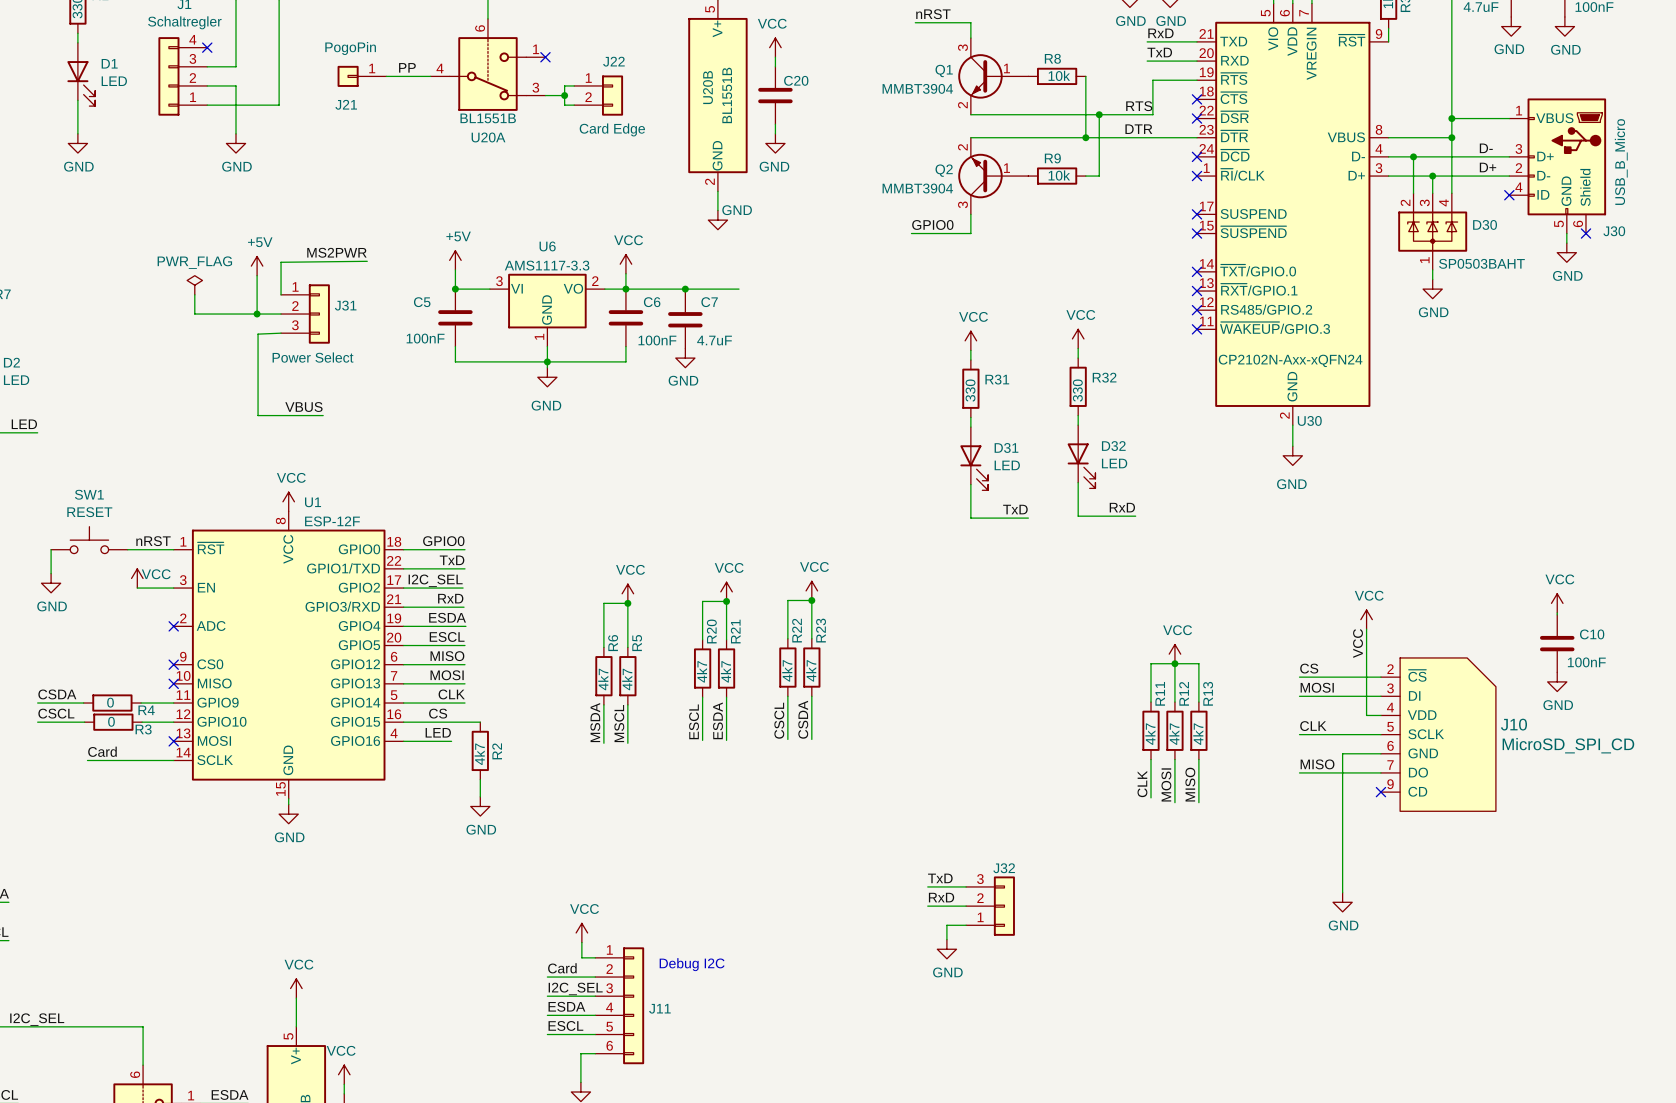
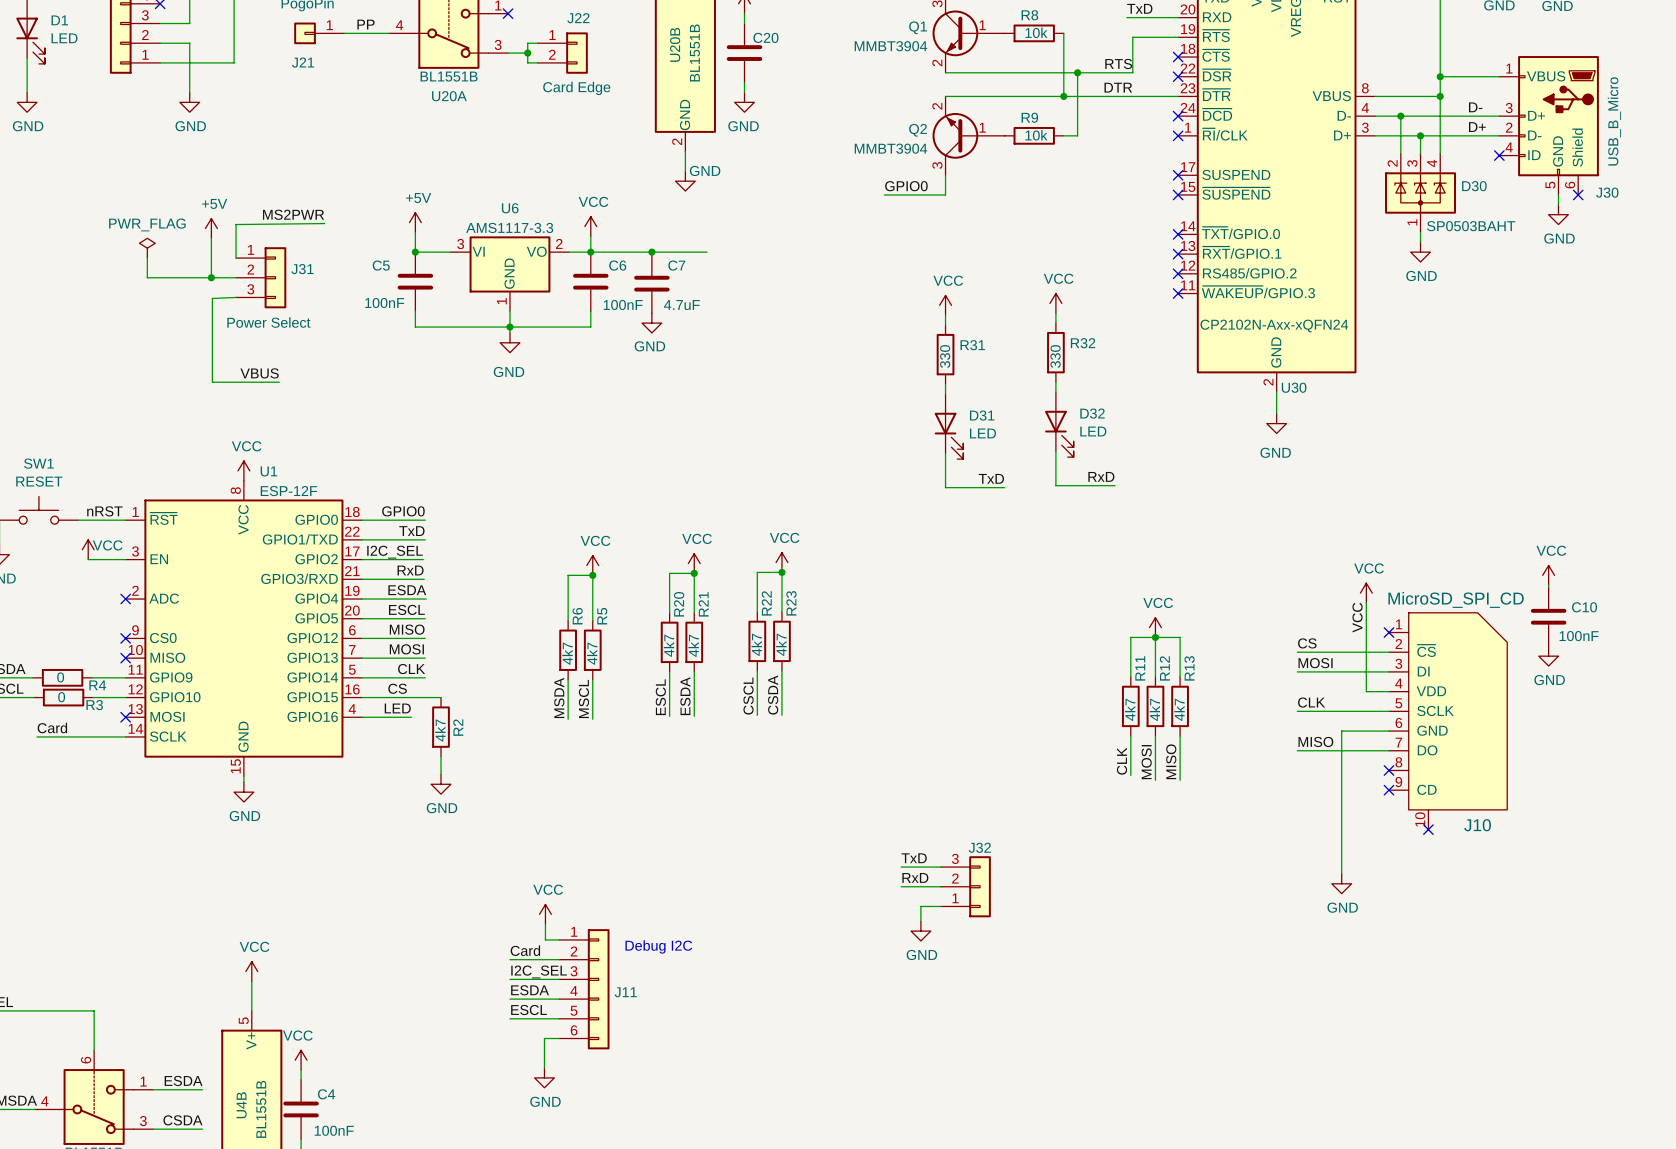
power symbol position: VCC (1366, 619) -> VCC (1366, 593)
wire: (1366, 629) (1366, 715) (1380, 715) -> none
wire: none -> (1366, 602) (1366, 691) (1388, 691)
label position: VCC (1358, 643) -> VCC (1357, 617)
J10 symbol: [1380, 657, 1496, 812] -> [1388, 612, 1508, 830]
no-connect mark: none -> (1388, 632)
label position: CS (1309, 668) -> CS (1307, 643)
wire: (1299, 677) (1380, 677) -> none
wire: none -> (1297, 652) (1388, 652)
label position: MOSI (1317, 687) -> MOSI (1315, 663)
wire: (1299, 696) (1380, 696) -> none
wire: none -> (1297, 671) (1388, 671)
J10 name position: J10 (1513, 724) -> J10 (1477, 825)
label position: CLK (1313, 726) -> CLK (1311, 702)
wire: (1299, 734) (1380, 734) -> none
wire: none -> (1297, 711) (1388, 711)
J10 value position: MicroSD_SPI_CD (1568, 745) -> MicroSD_SPI_CD (1456, 599)
wire: (1380, 753) (1342, 753) (1342, 892) -> none
wire: none -> (1388, 731) (1341, 731) (1341, 873)
label position: MISO (1317, 764) -> MISO (1315, 741)
wire: (1299, 772) (1380, 772) -> none
wire: none -> (1297, 750) (1388, 750)
no-connect mark: (1380, 792) -> none
no-connect mark: none -> (1388, 770)
no-connect mark: none -> (1388, 790)
no-connect mark: none -> (1428, 829)
power symbol position: GND (1342, 902) -> GND (1341, 883)

